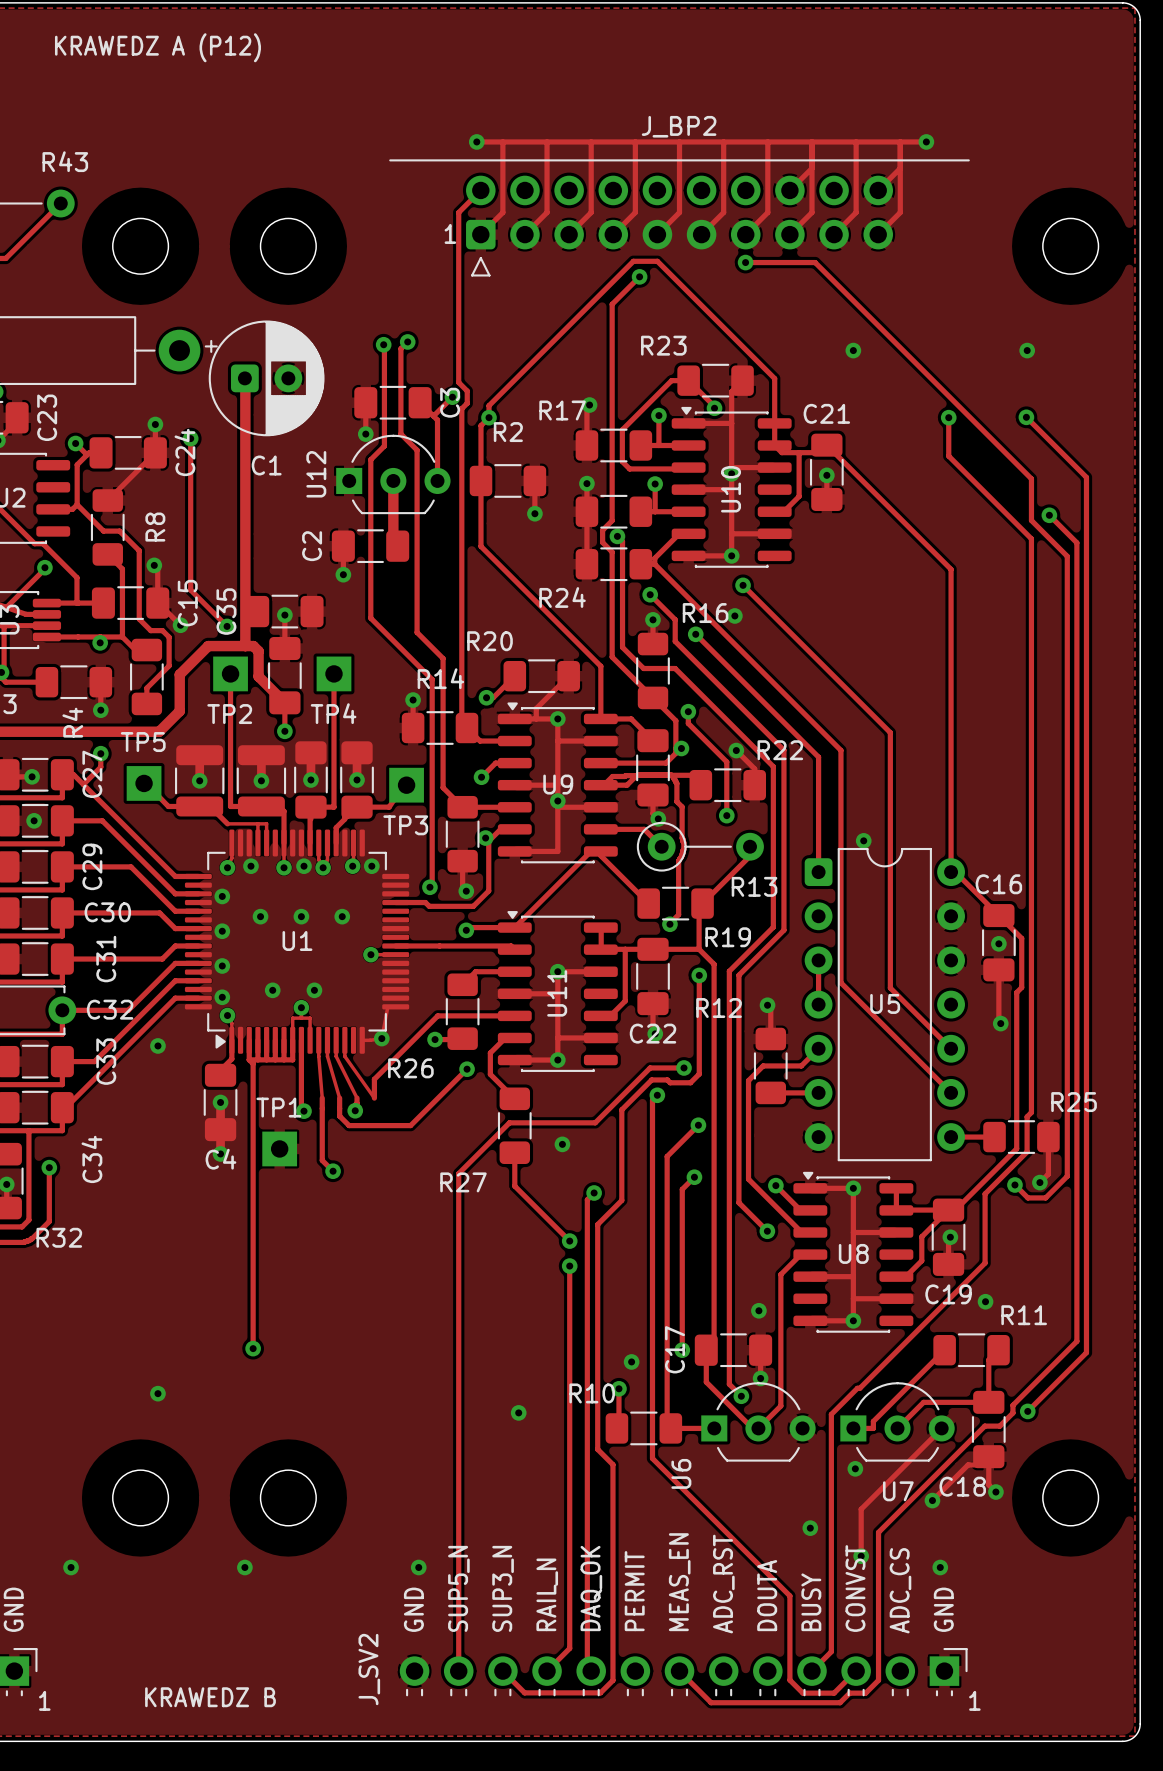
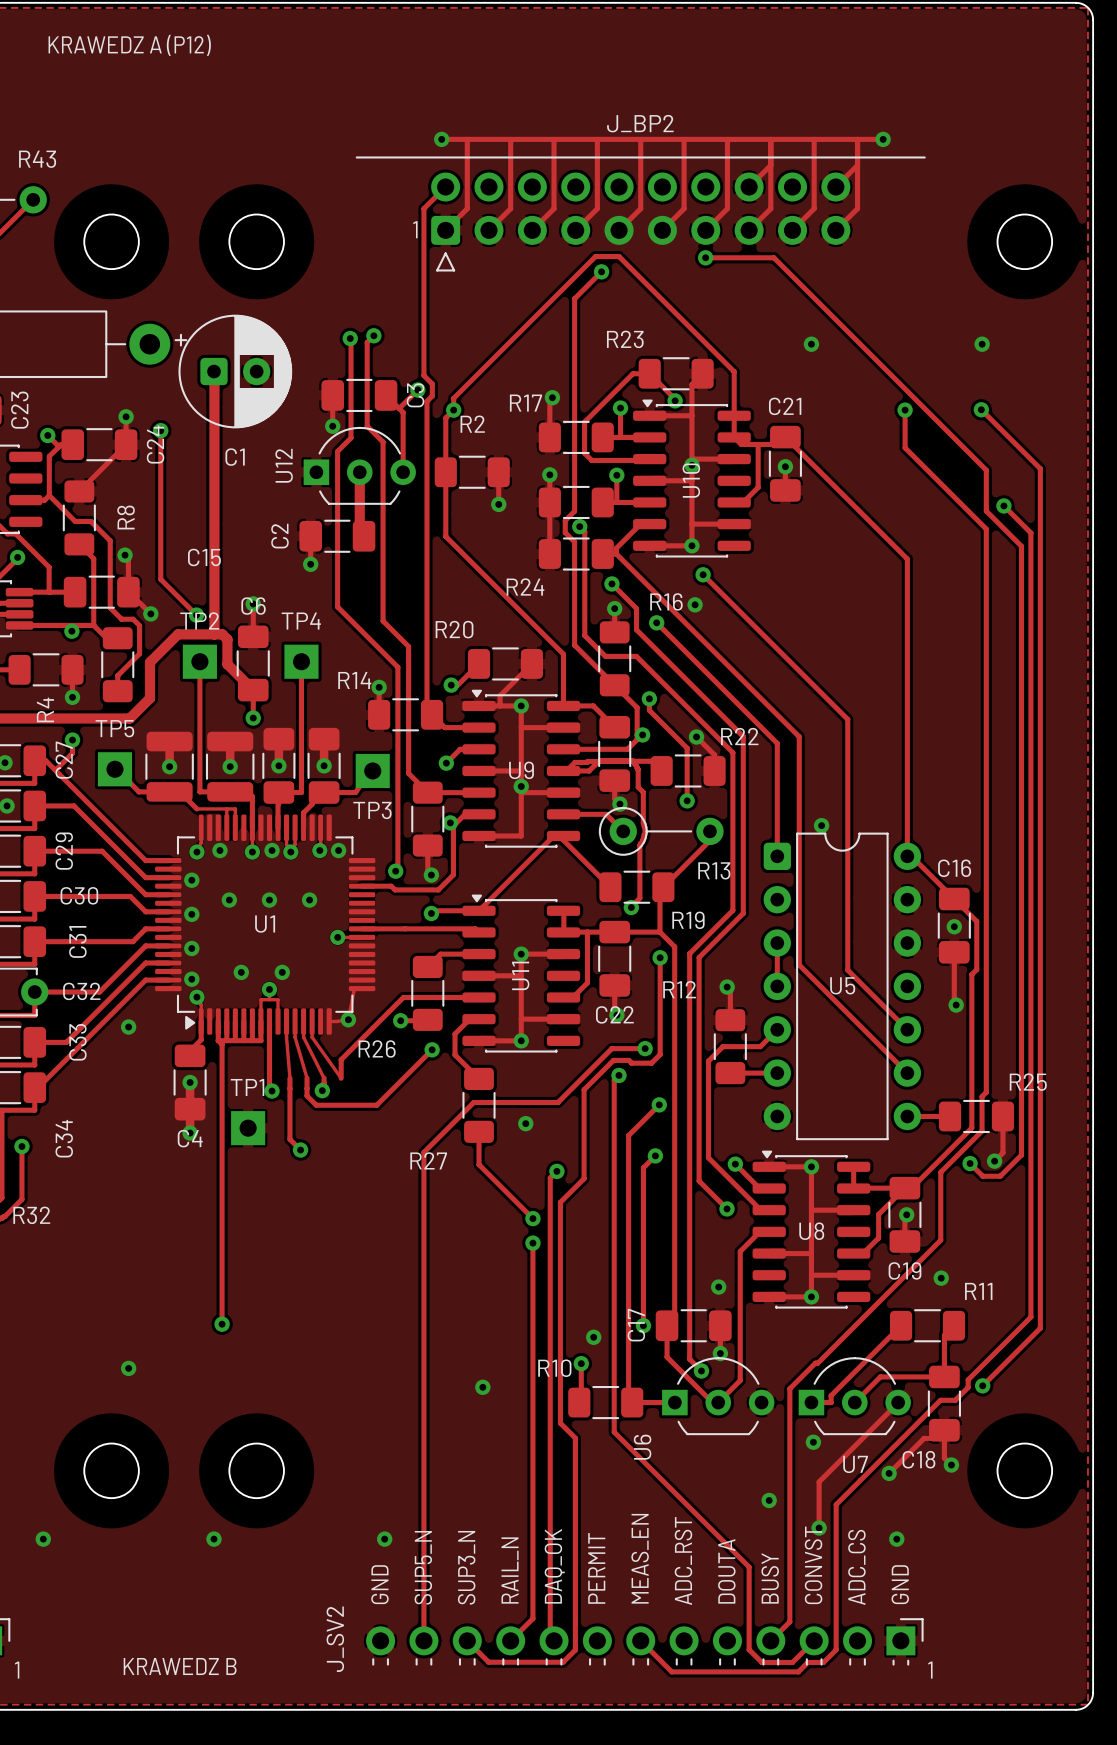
C15 name rotation: 0° (187, 603) -> 90° clockwise (204, 557)
C35: (284, 611) -> none
C6 name: none -> C6 (253, 606)
R14 name position: R14 (440, 678) -> R14 (354, 680)
TP4 name position: TP4 (333, 713) -> TP4 (301, 621)
TP2 name position: TP2 (229, 714) -> TP2 (199, 620)

